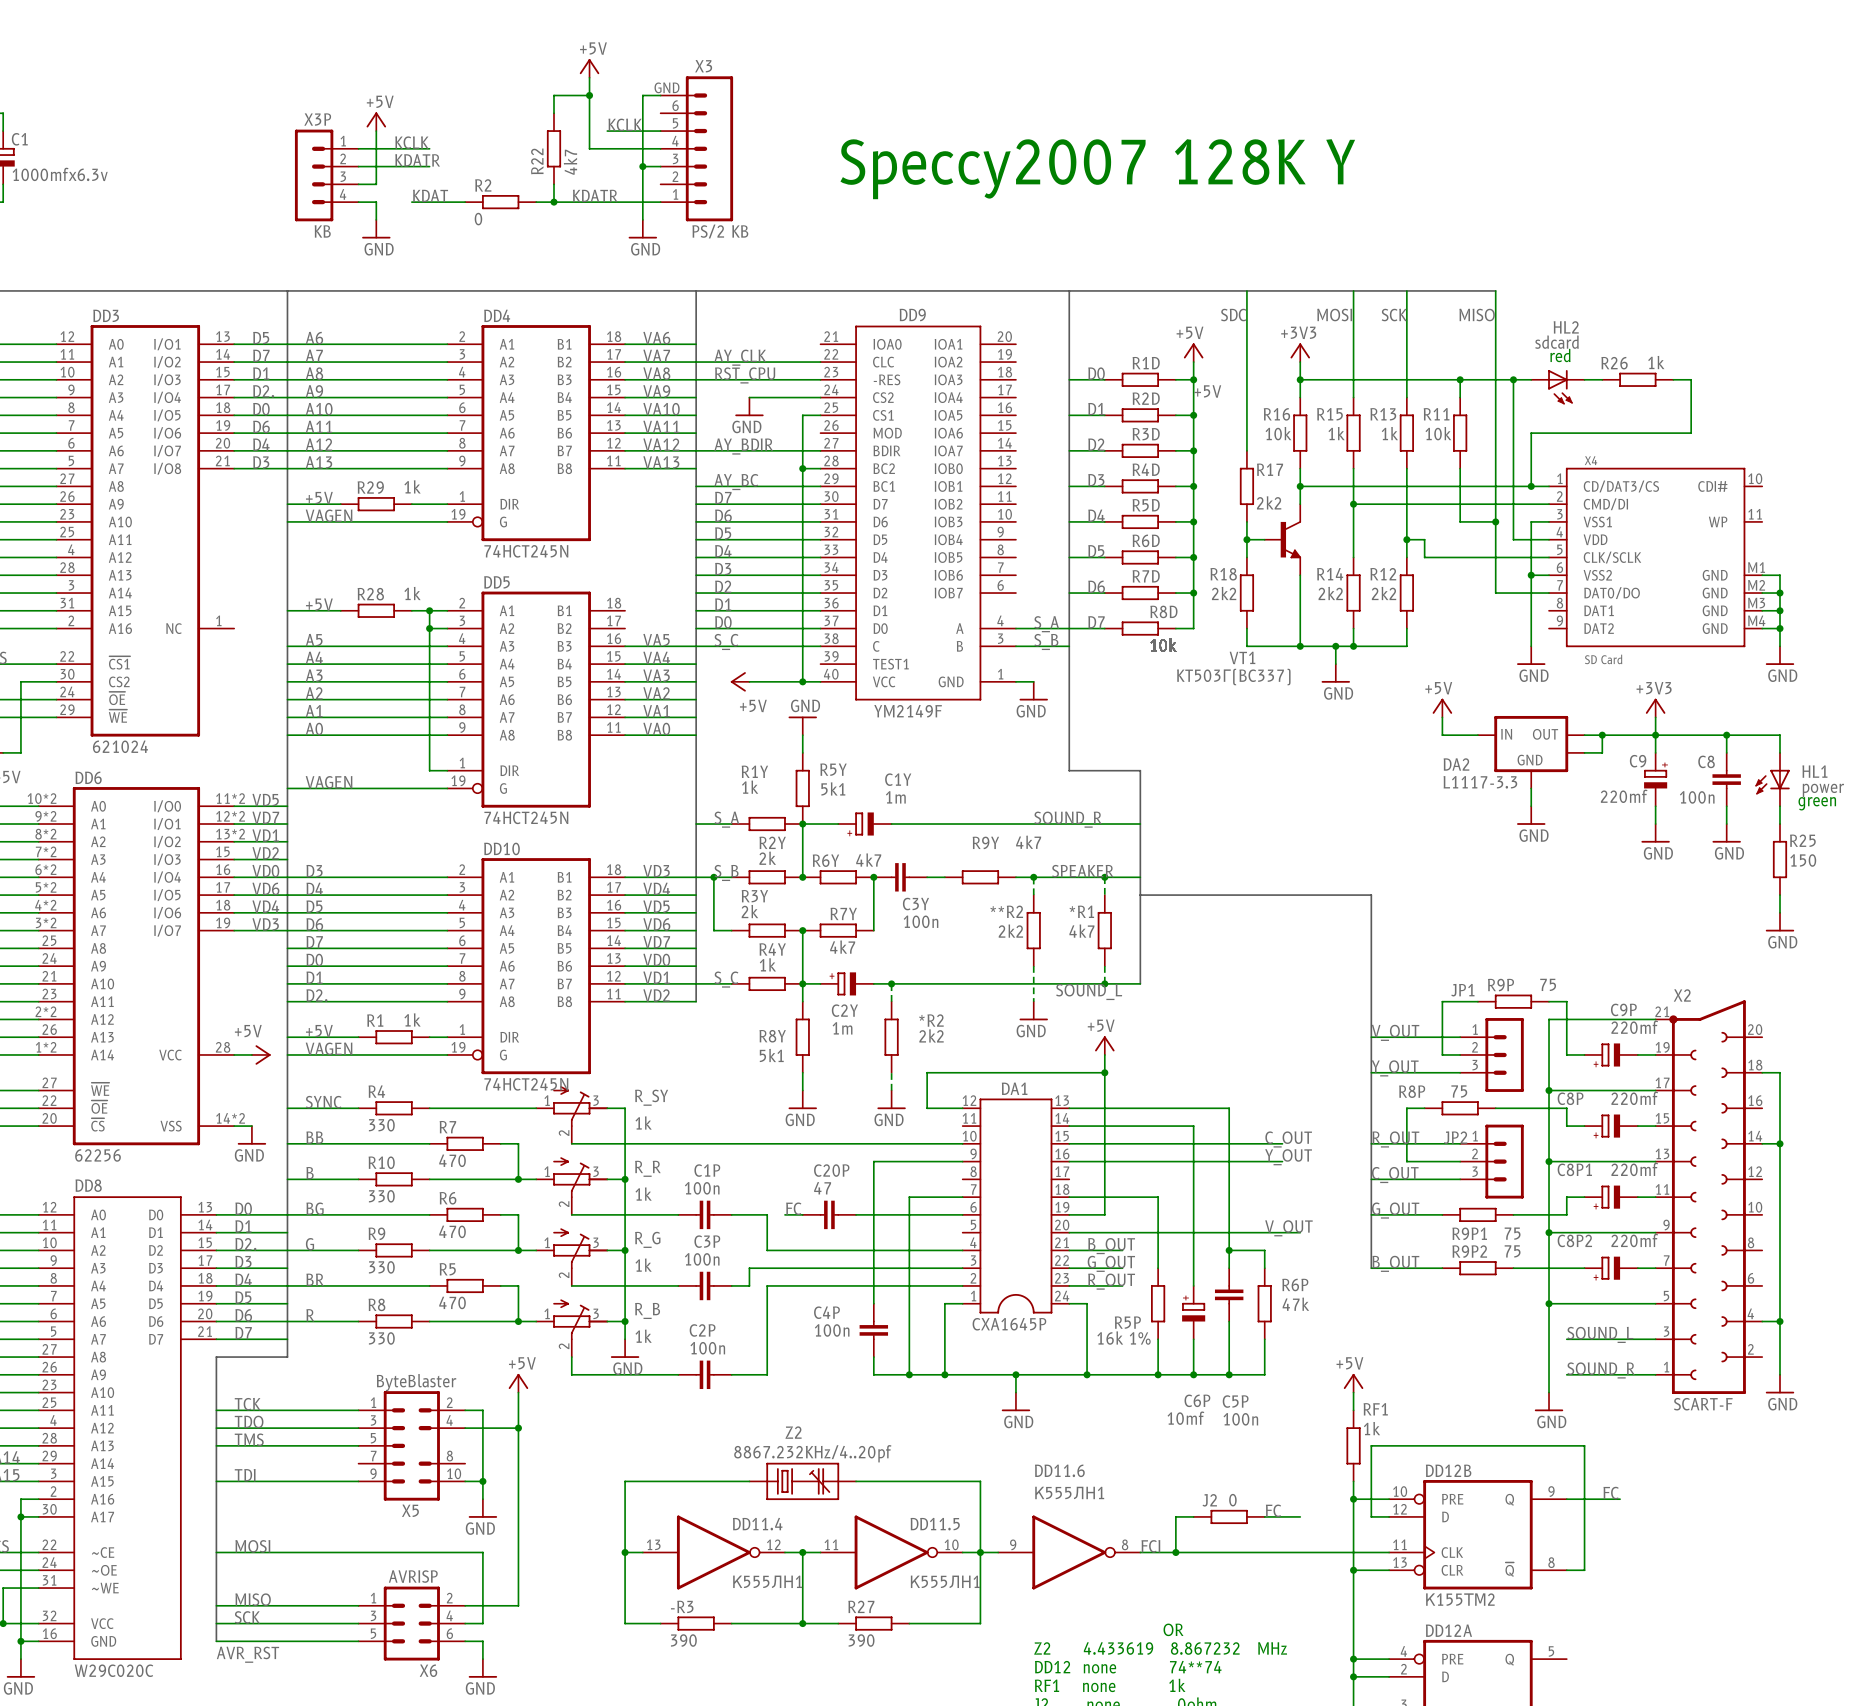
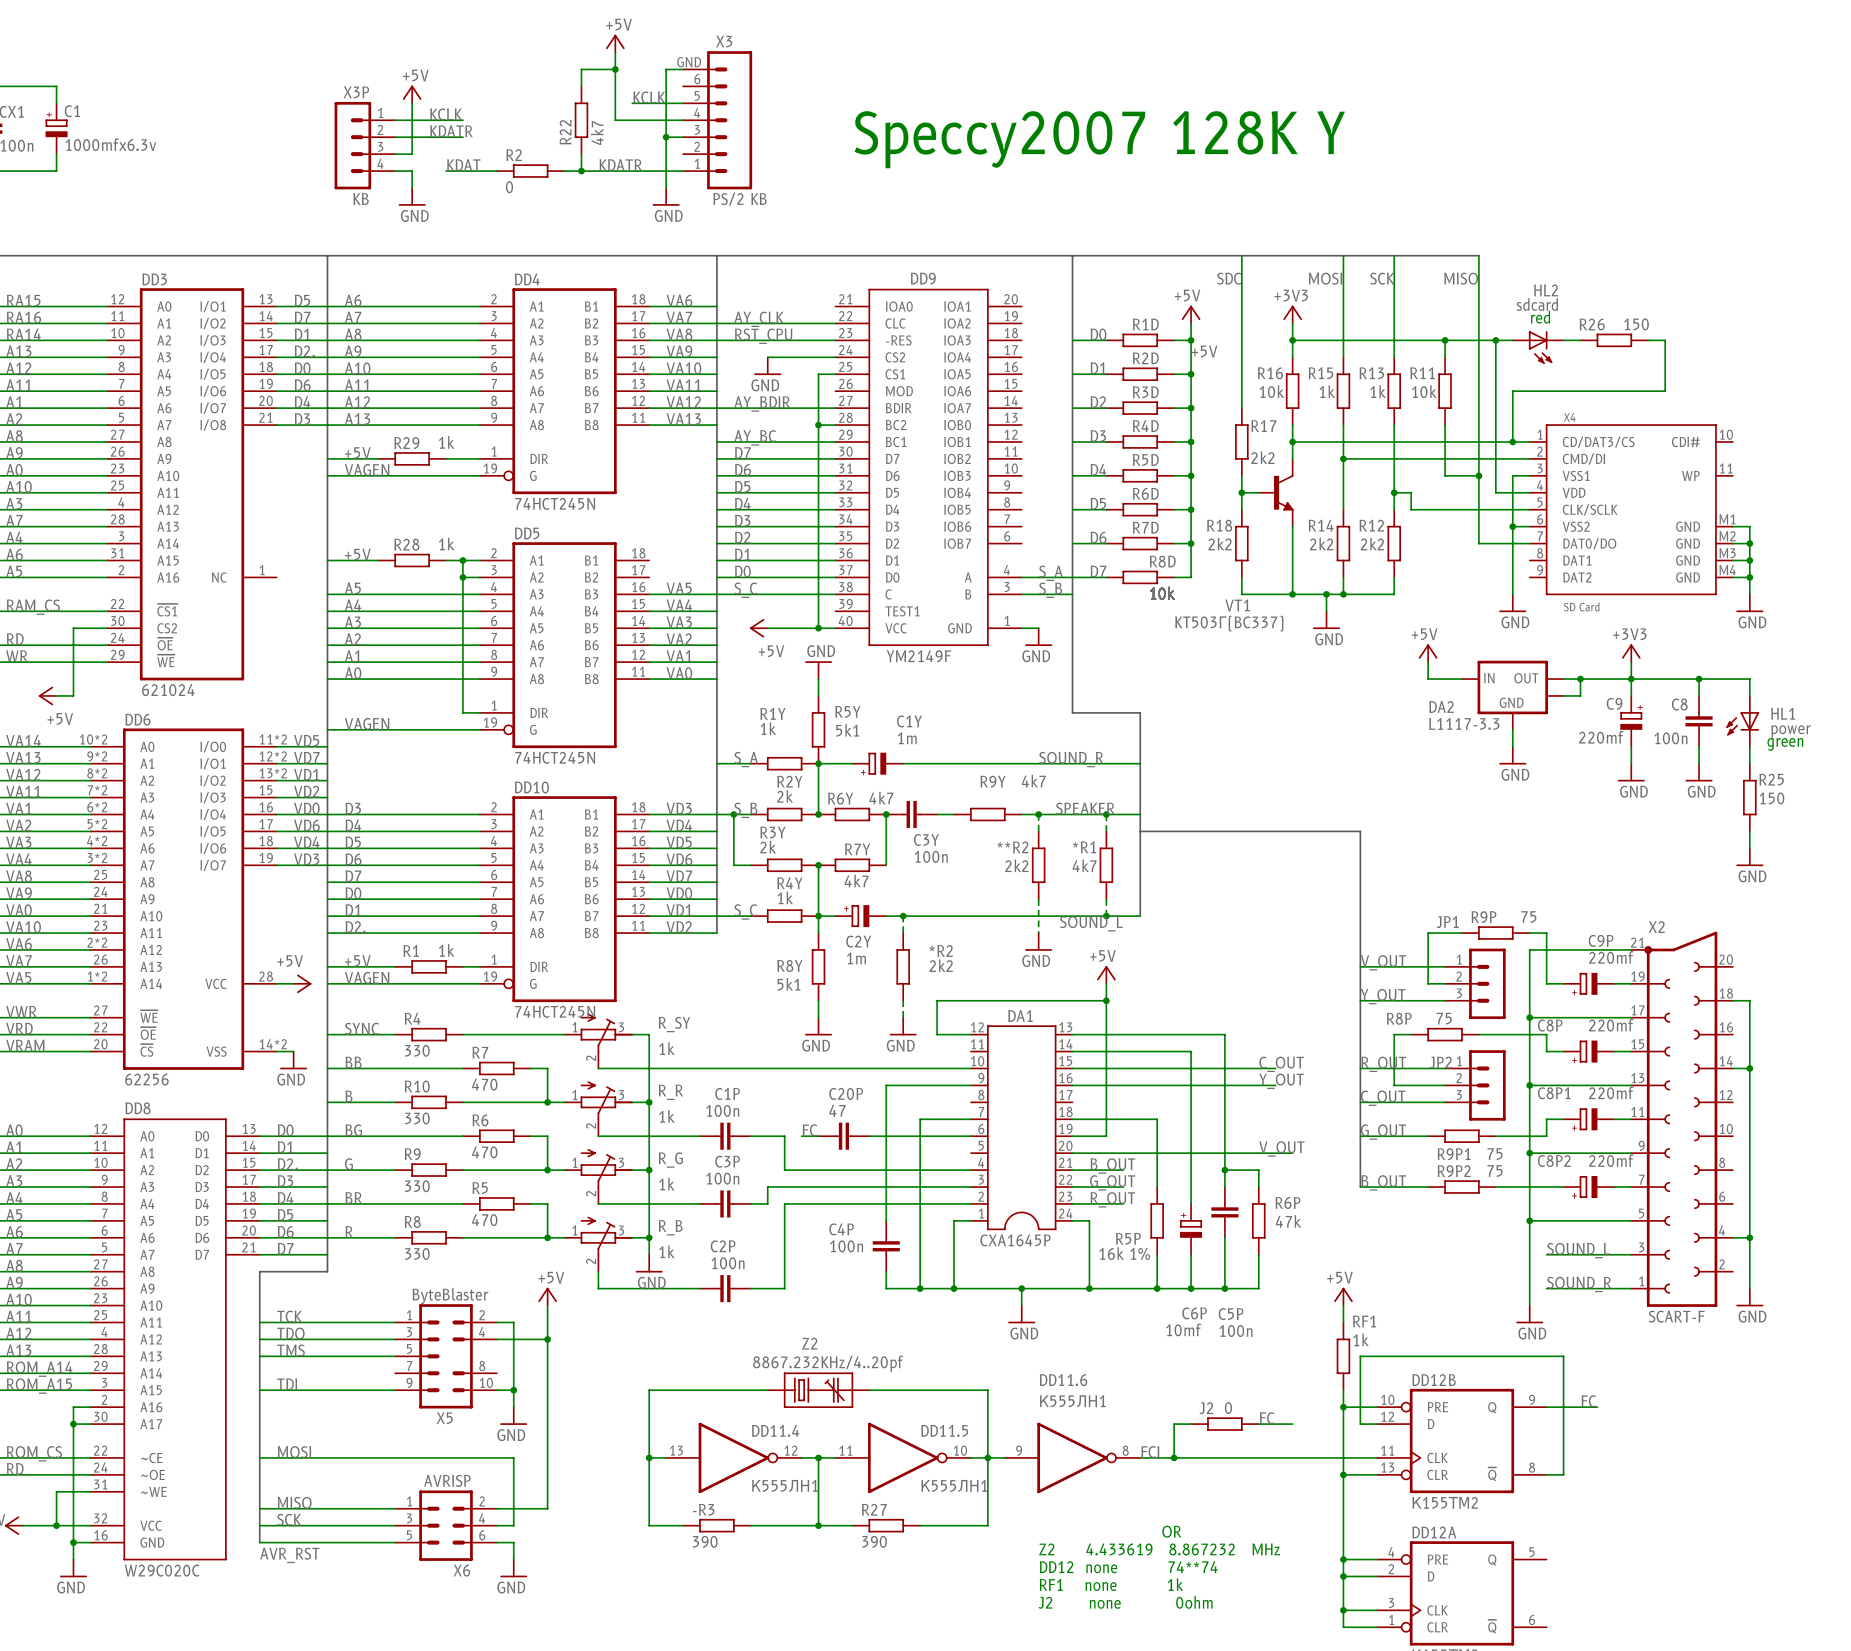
R26 value: 1k (1656, 362) -> 150 (1636, 324)

